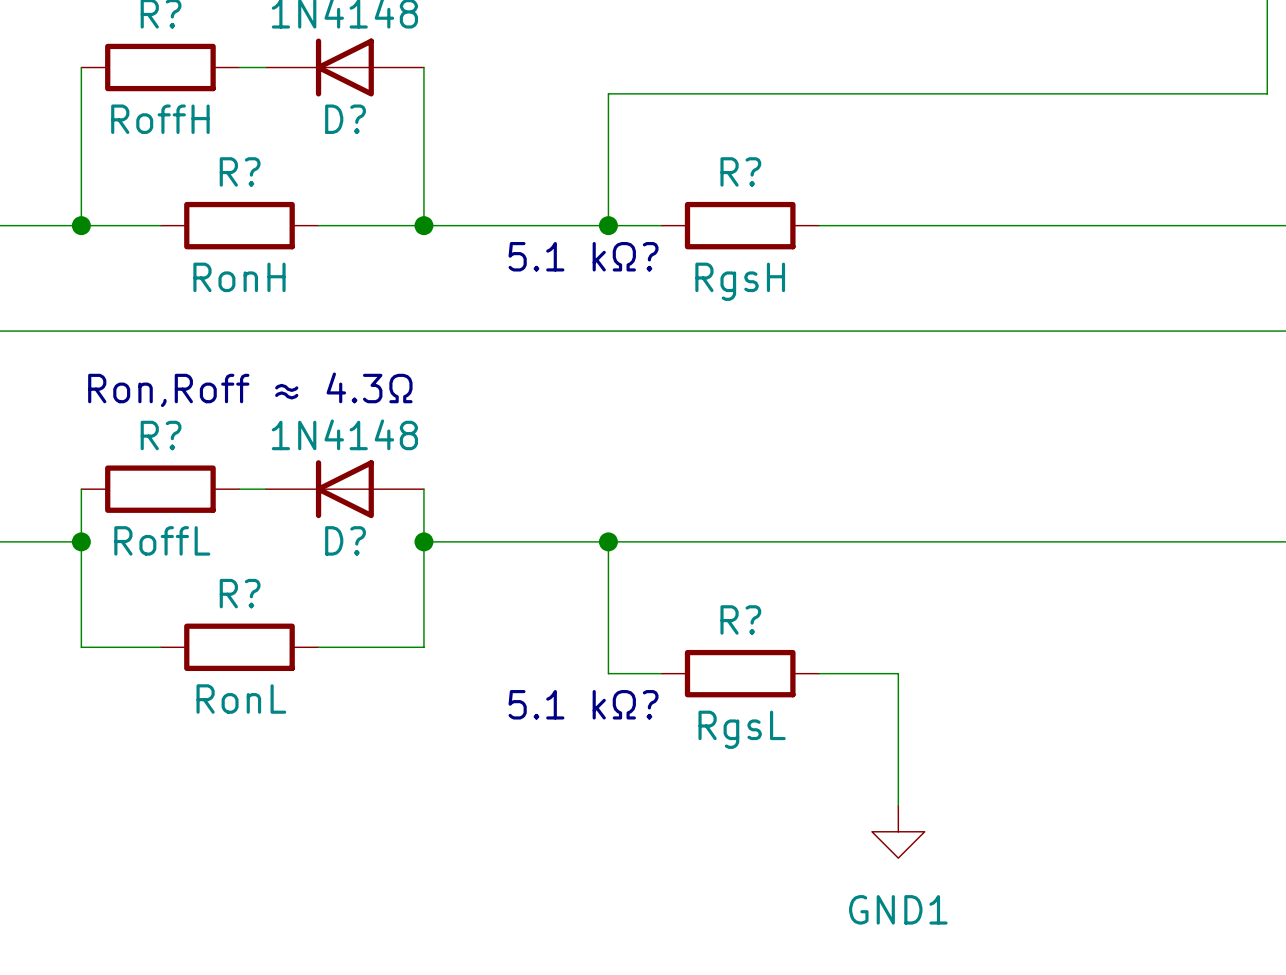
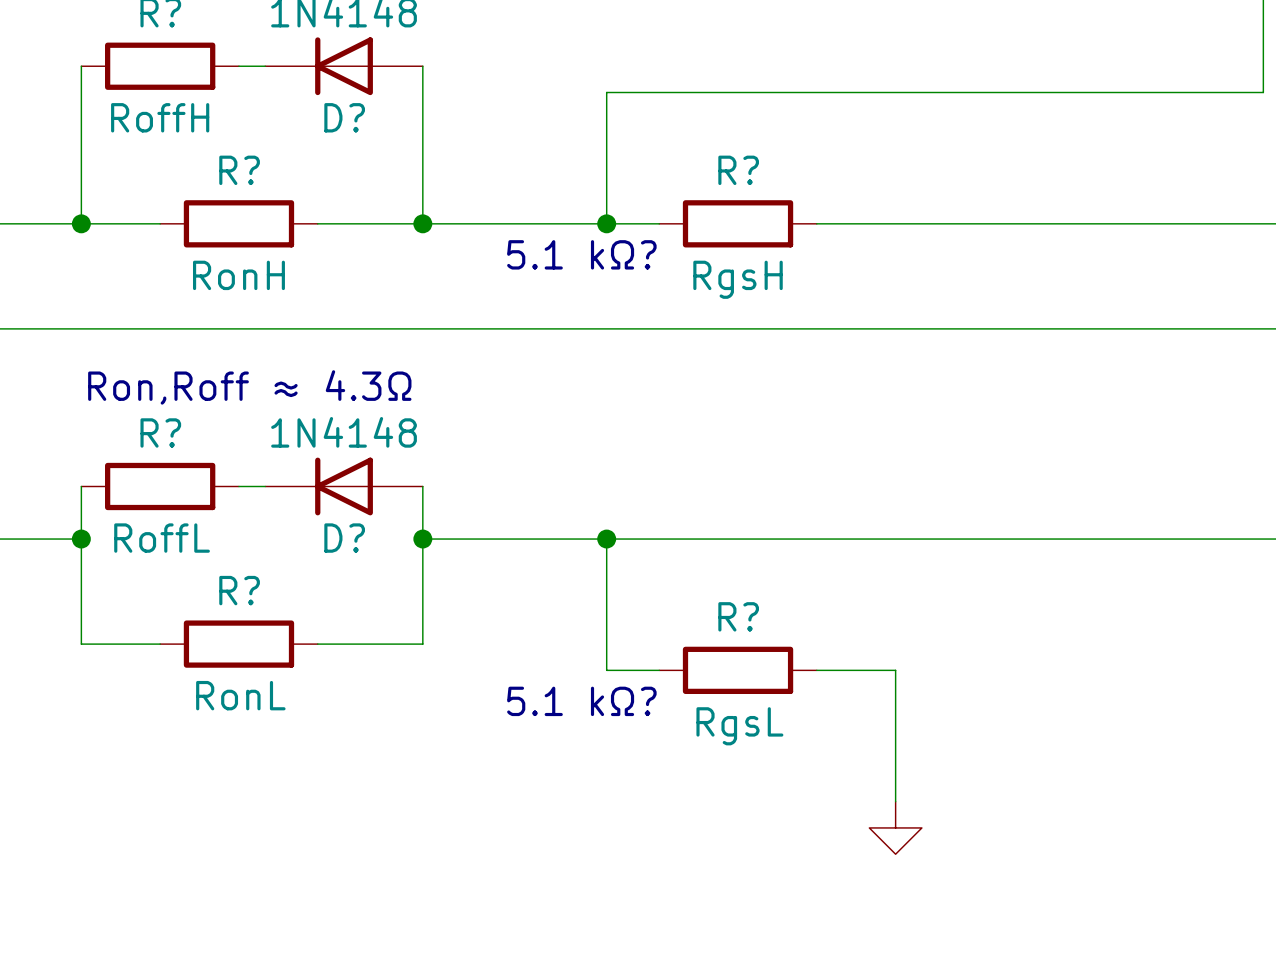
power symbol text: GND1 (898, 909) -> none

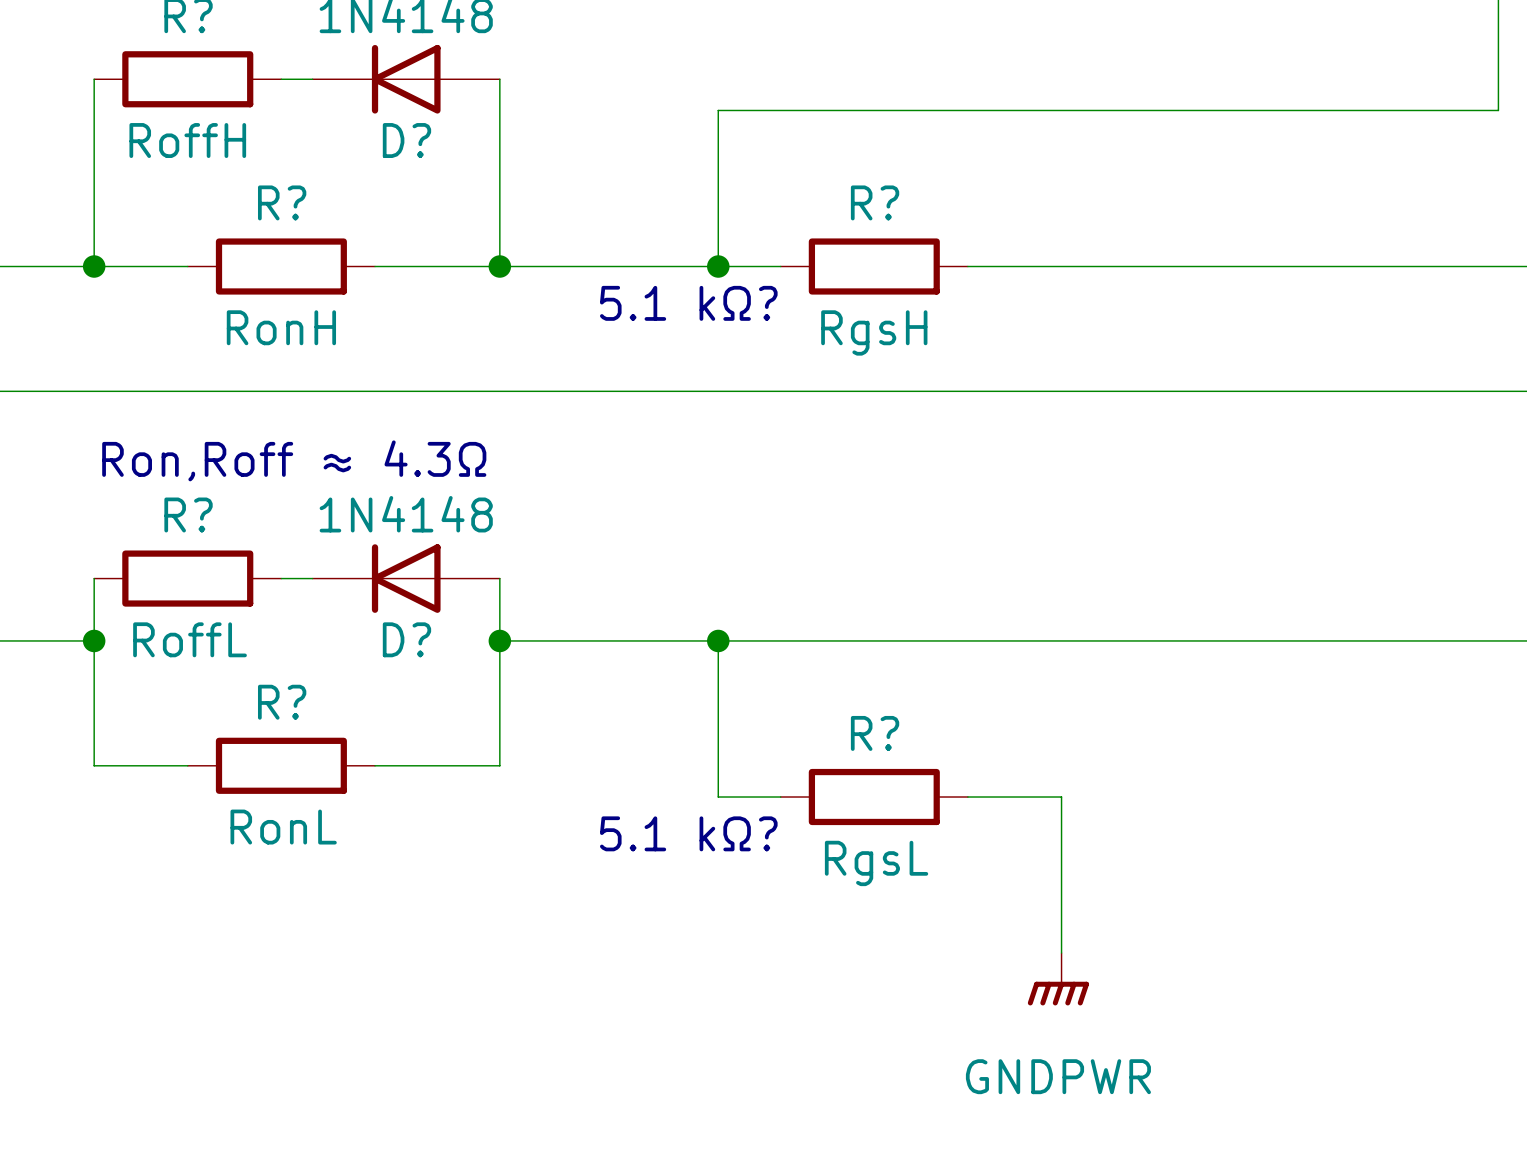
power symbol shape: [869, 801, 922, 855] -> [1027, 953, 1090, 1006]
power symbol text: none -> GNDPWR (1058, 1076)

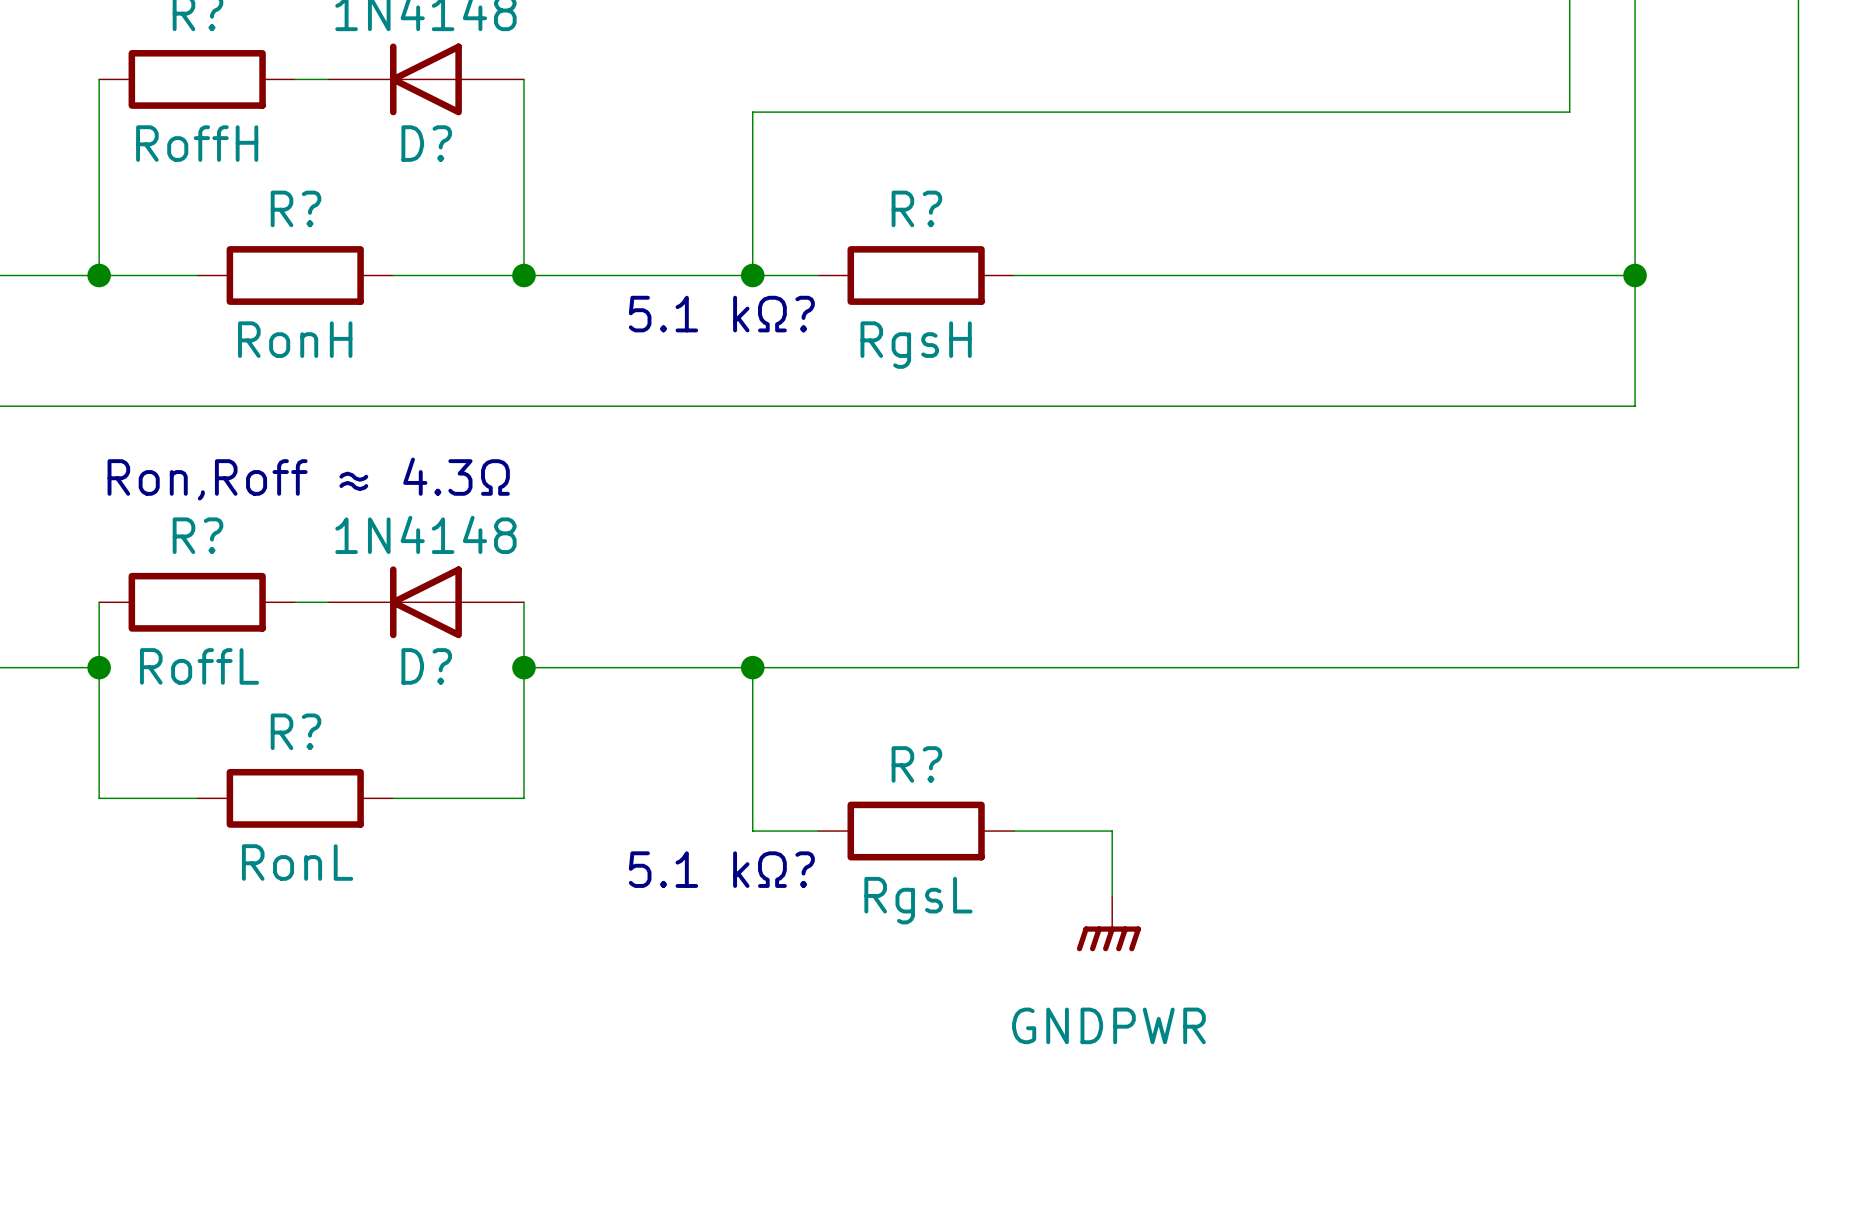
wire: (1061, 859) (1061, 953) -> none
power symbol position: GNDPWR (1058, 979) -> GNDPWR (1108, 923)

